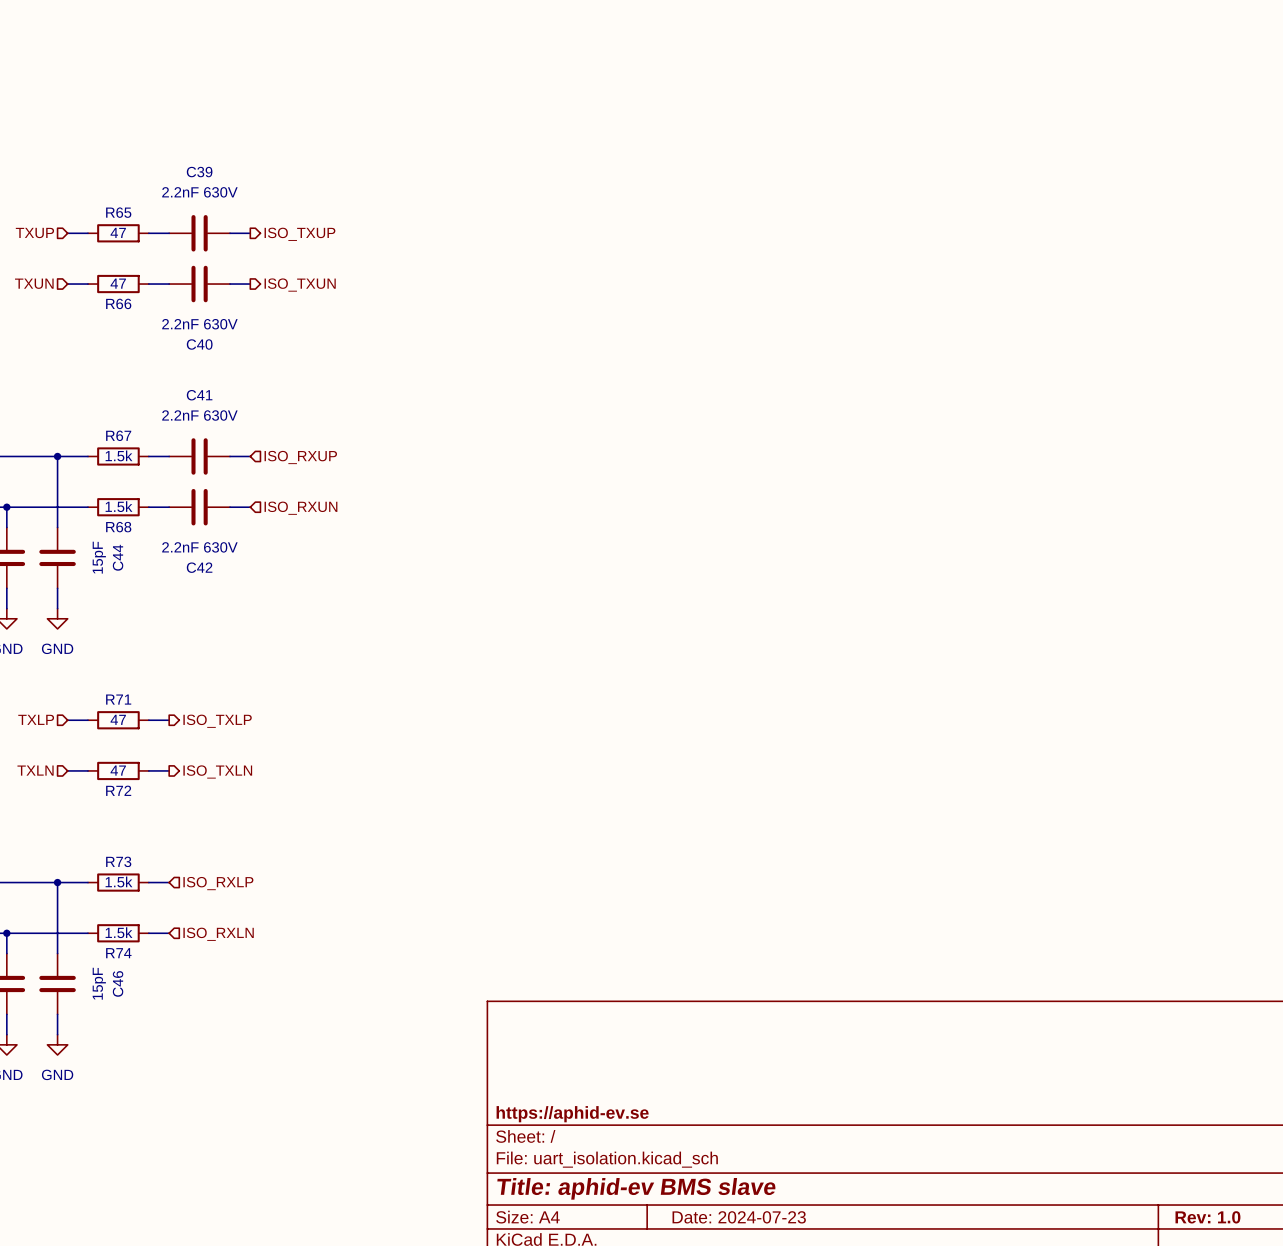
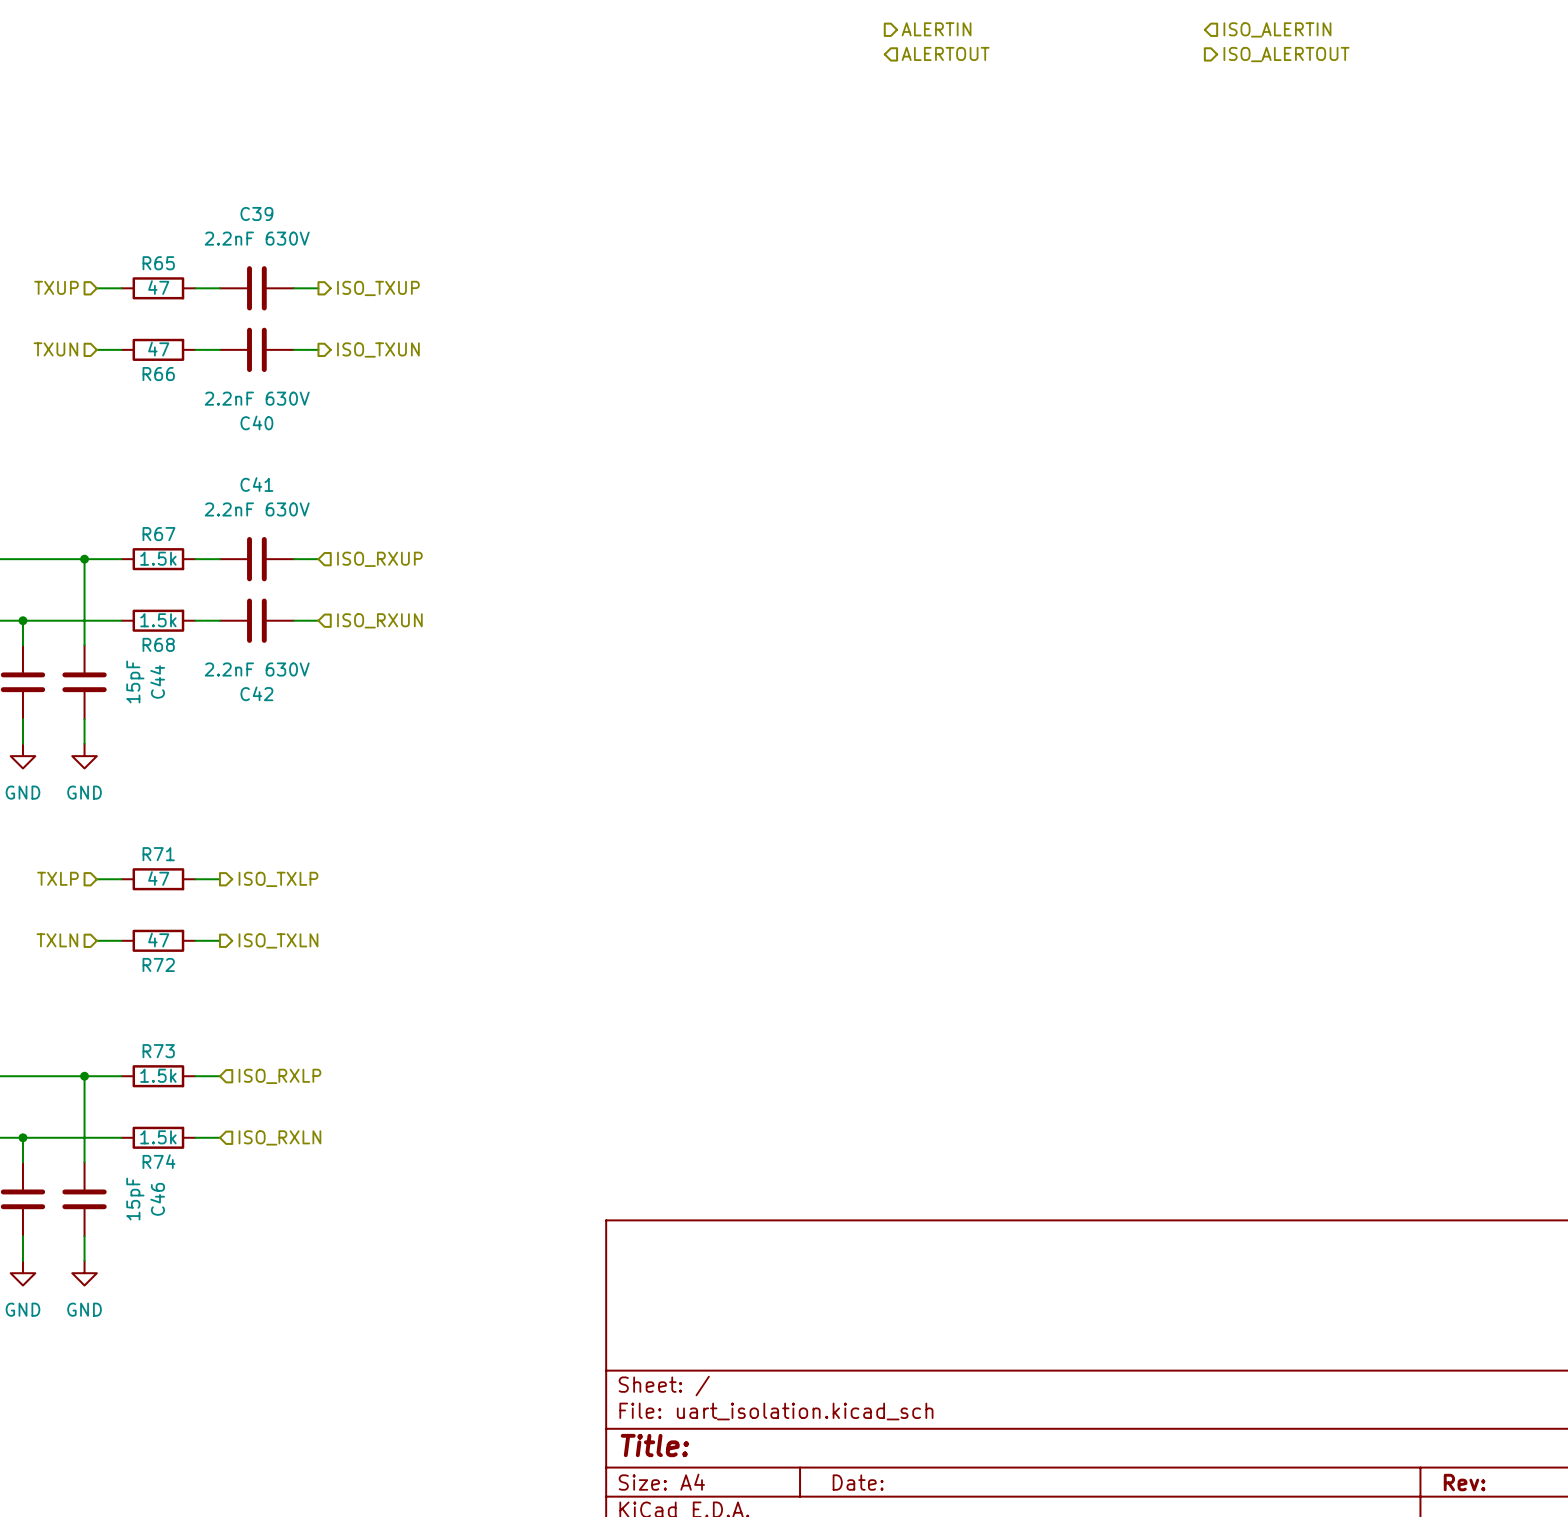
hierarchical label: none -> ALERTIN (936, 29)
hierarchical label: none -> ISO_ALERTIN (1277, 29)
hierarchical label: none -> ALERTOUT (945, 53)
hierarchical label: none -> ISO_ALERTOUT (1286, 54)
title block: https://aphid-ev.se (572, 1114) -> none
title block: Title: aphid-ev BMS slave (636, 1188) -> Title: (654, 1445)
title block: Date: 2024-07-23 (739, 1217) -> Date: (858, 1482)
title block: Rev: 1.0 (1207, 1217) -> Rev: (1464, 1482)

